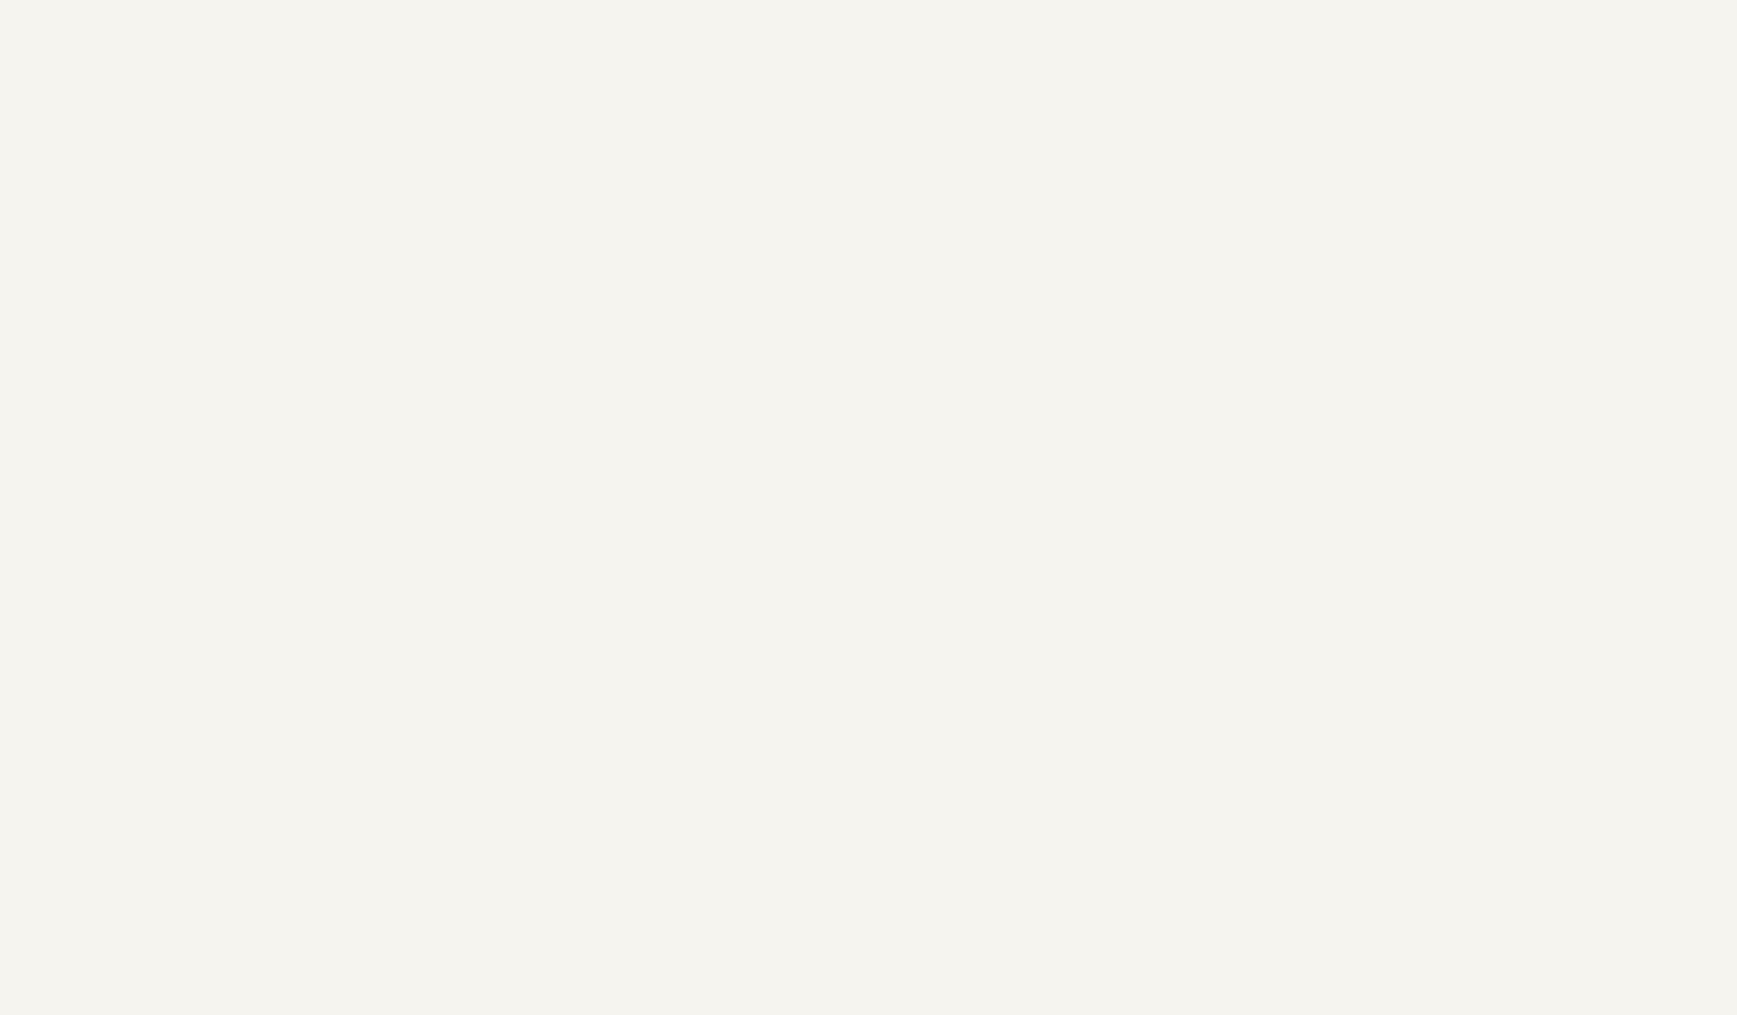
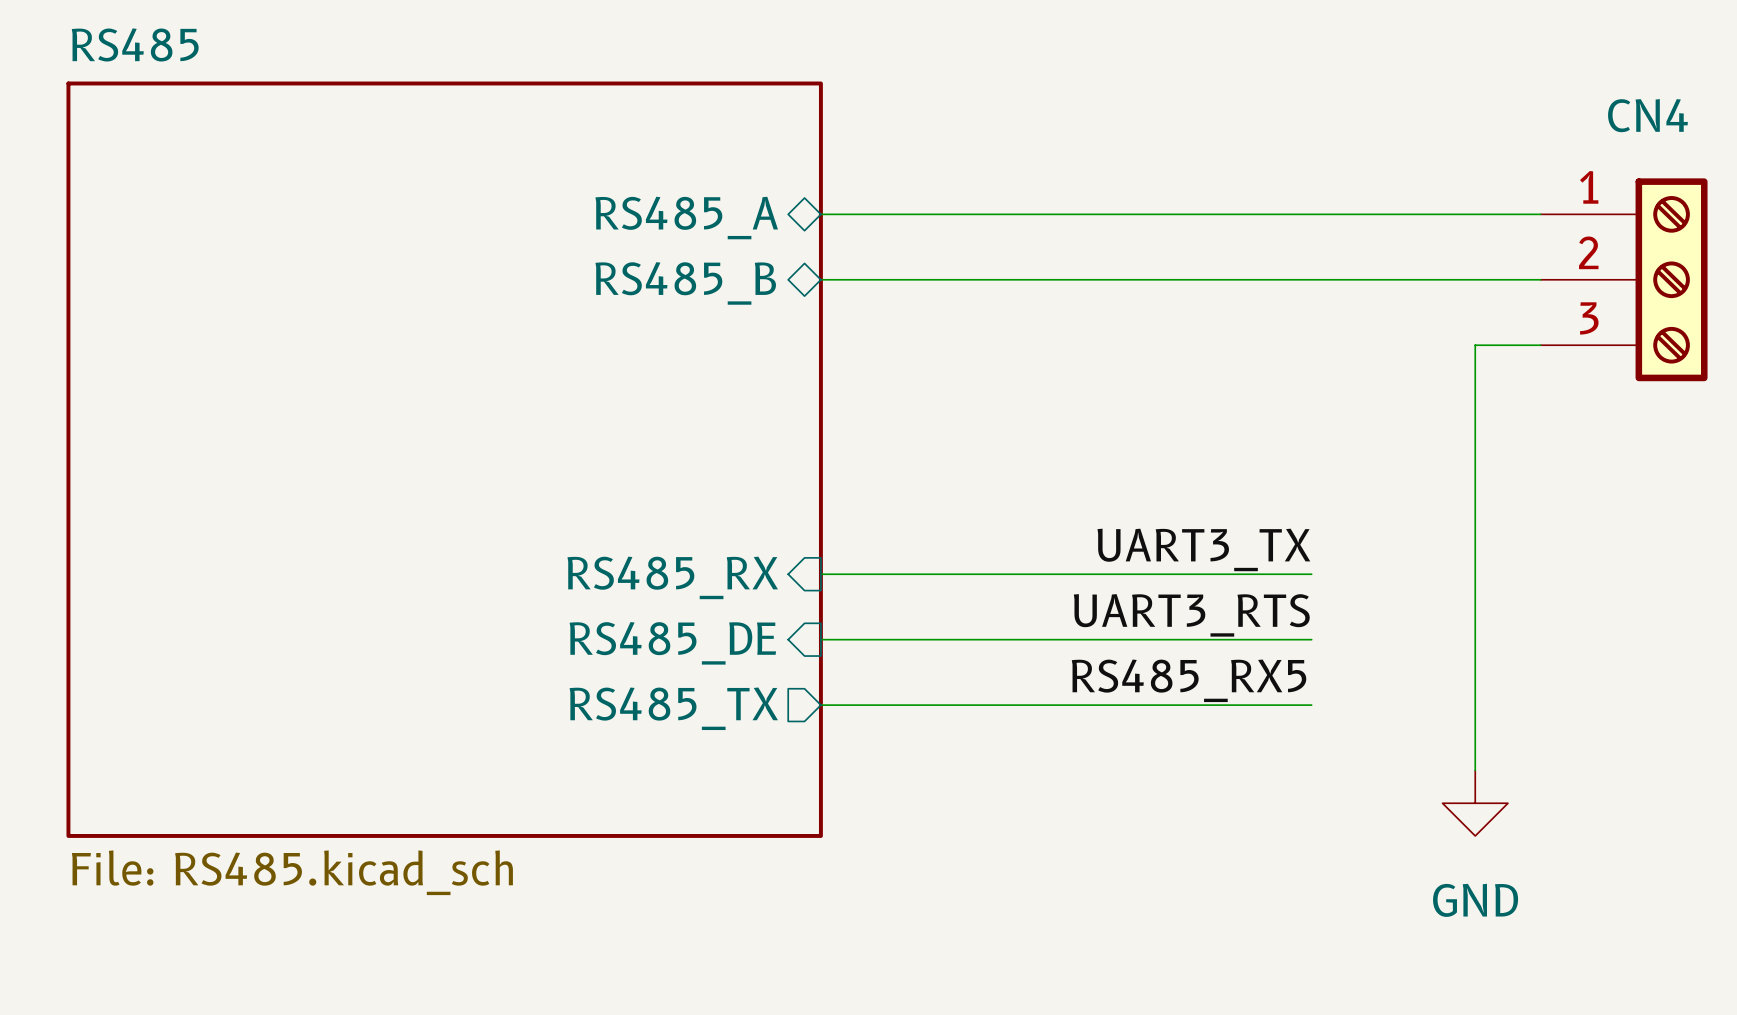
sheet pin: none -> RS485_A (686, 218)
wire: none -> (820, 214) (1540, 214)
sheet pin: none -> RS485_B (685, 283)
wire: none -> (820, 279) (1540, 279)
CN4: none -> (1624, 279)
wire: none -> (1540, 345) (1475, 345) (1475, 770)
sheet RS485: none -> File: RS485.kicad_sch (444, 459)
label: none -> UART3_TX (1203, 549)
sheet pin: none -> RS485_RX (672, 577)
wire: none -> (820, 574) (1311, 574)
label: none -> UART3_RTS (1191, 615)
sheet pin: none -> RS485_DE (672, 643)
wire: none -> (820, 639) (1311, 639)
label: none -> RS485_RX5 (1189, 680)
sheet pin: none -> RS485_TX (673, 708)
wire: none -> (820, 705) (1311, 705)
power symbol: none -> GND (1475, 803)

